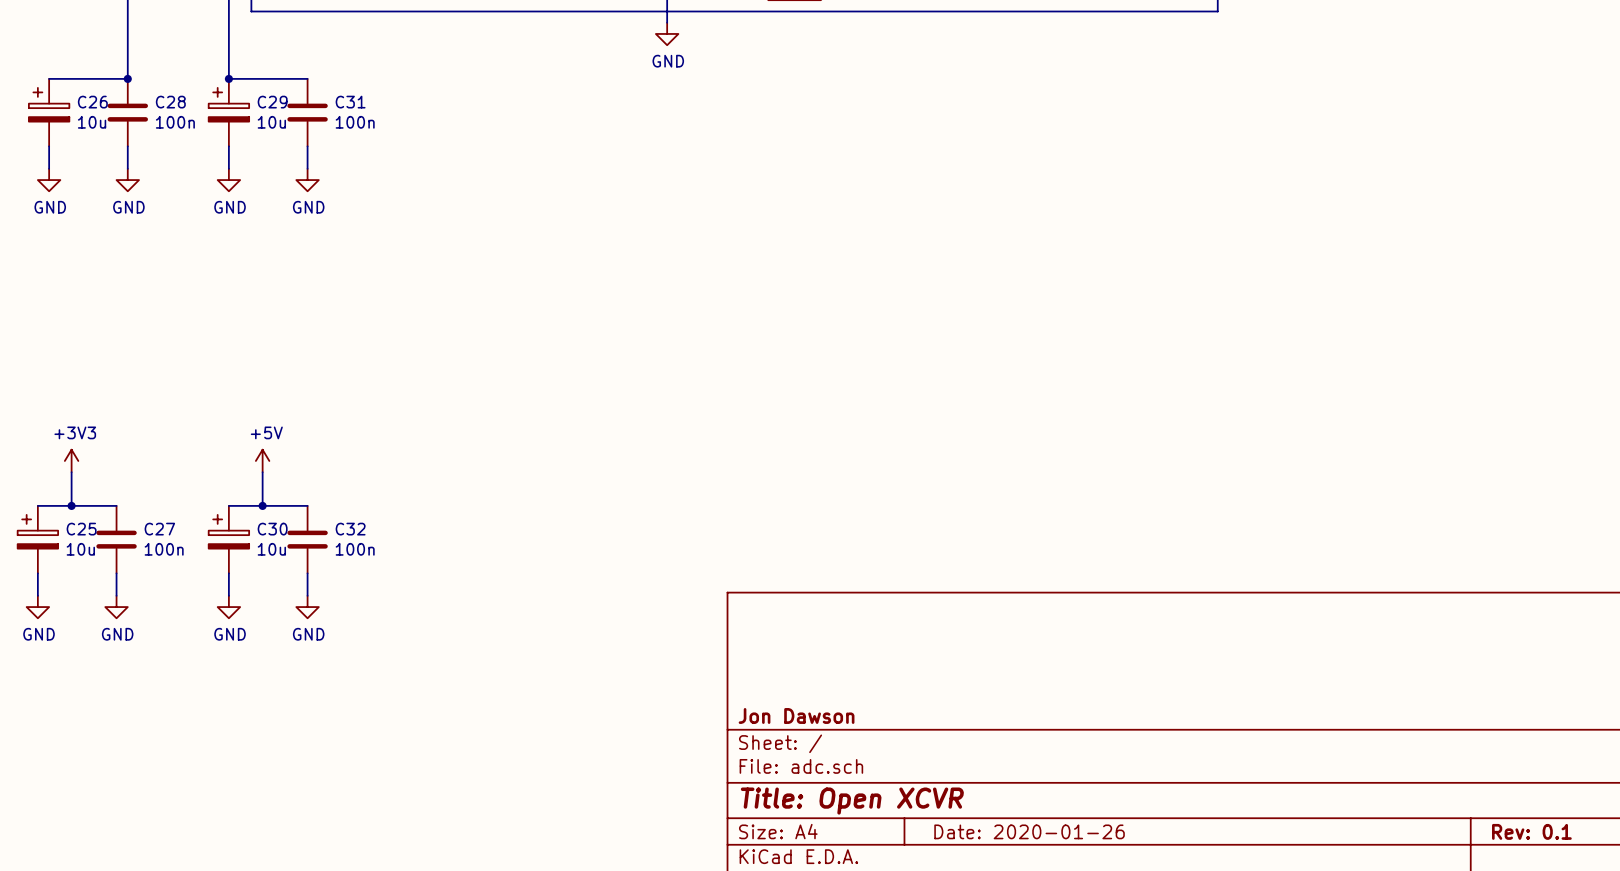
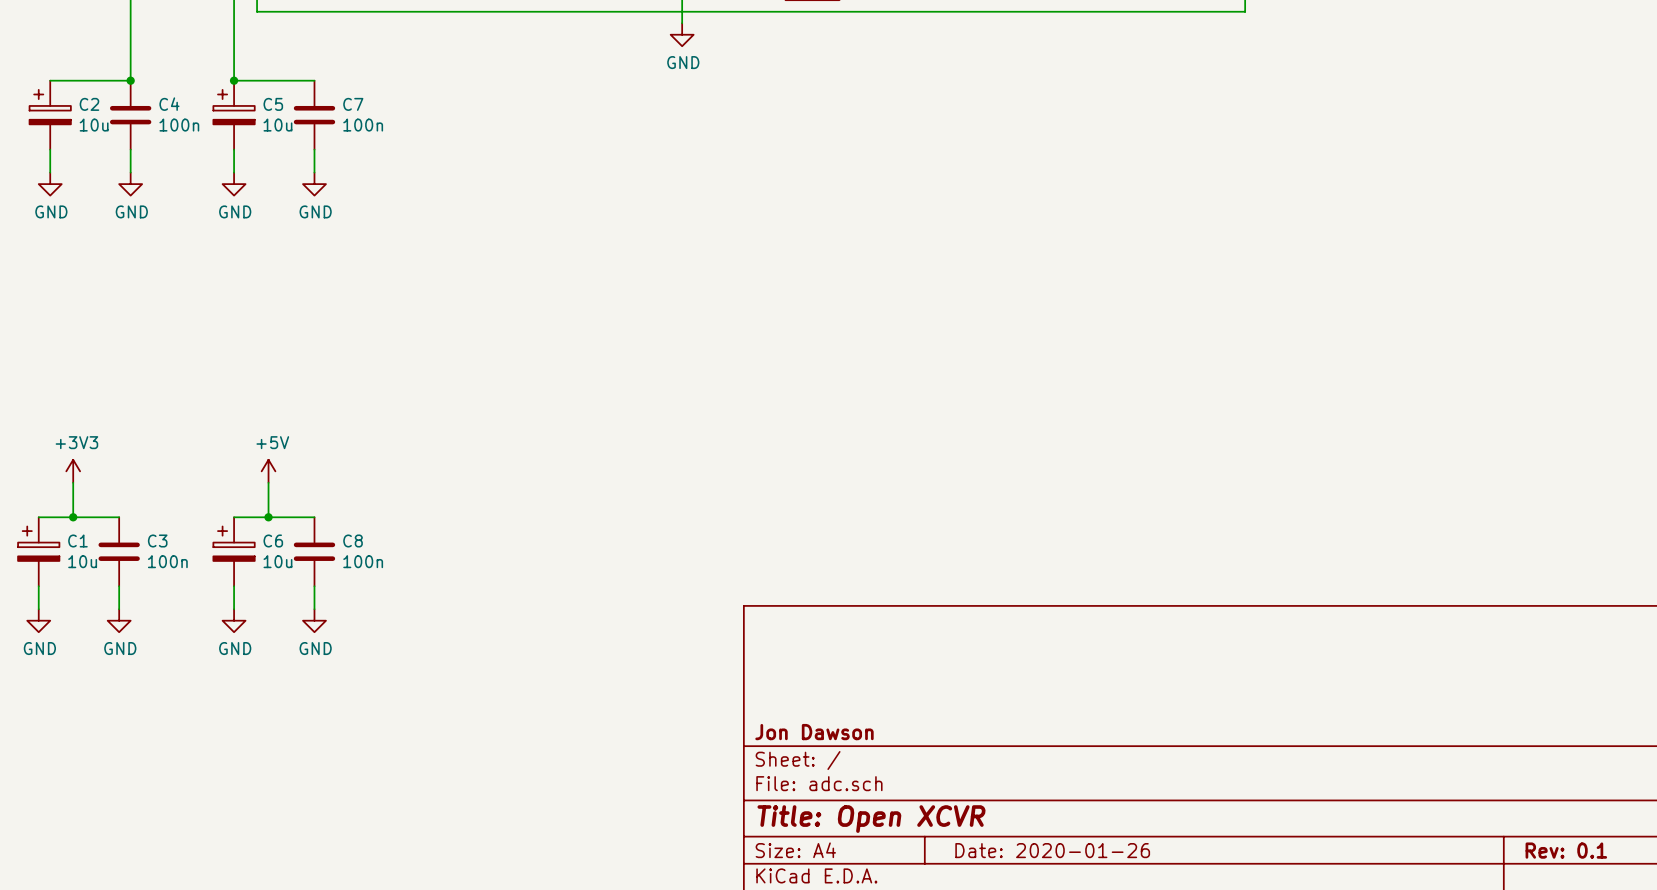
C26 name: C26 (92, 102) -> C2 (89, 104)
C28 name: C28 (170, 102) -> C4 (169, 104)
C29 name: C29 (272, 102) -> C5 (273, 104)
C31 name: C31 (350, 102) -> C7 (353, 104)
C25 name: C25 (81, 529) -> C1 (77, 540)
C27 name: C27 (159, 529) -> C3 (157, 540)
C30 name: C30 (272, 529) -> C6 (273, 540)
C32 name: C32 (350, 529) -> C8 (353, 540)

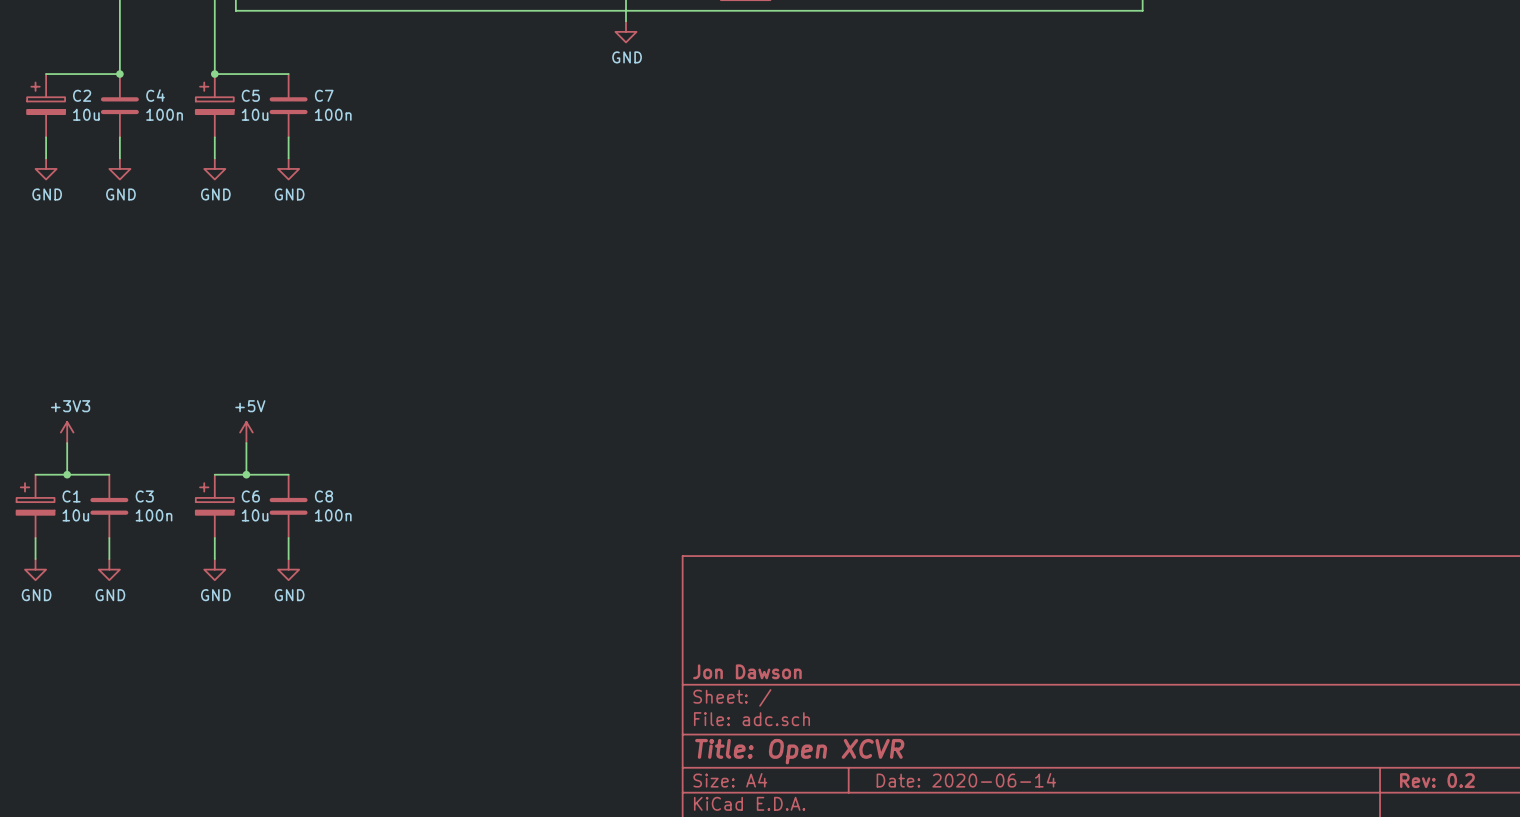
title block: Date: 2020-01-26 (1052, 850) -> Date: 2020-06-14 (966, 780)
title block: Rev: 0.1 (1566, 850) -> Rev: 0.2 (1437, 780)

